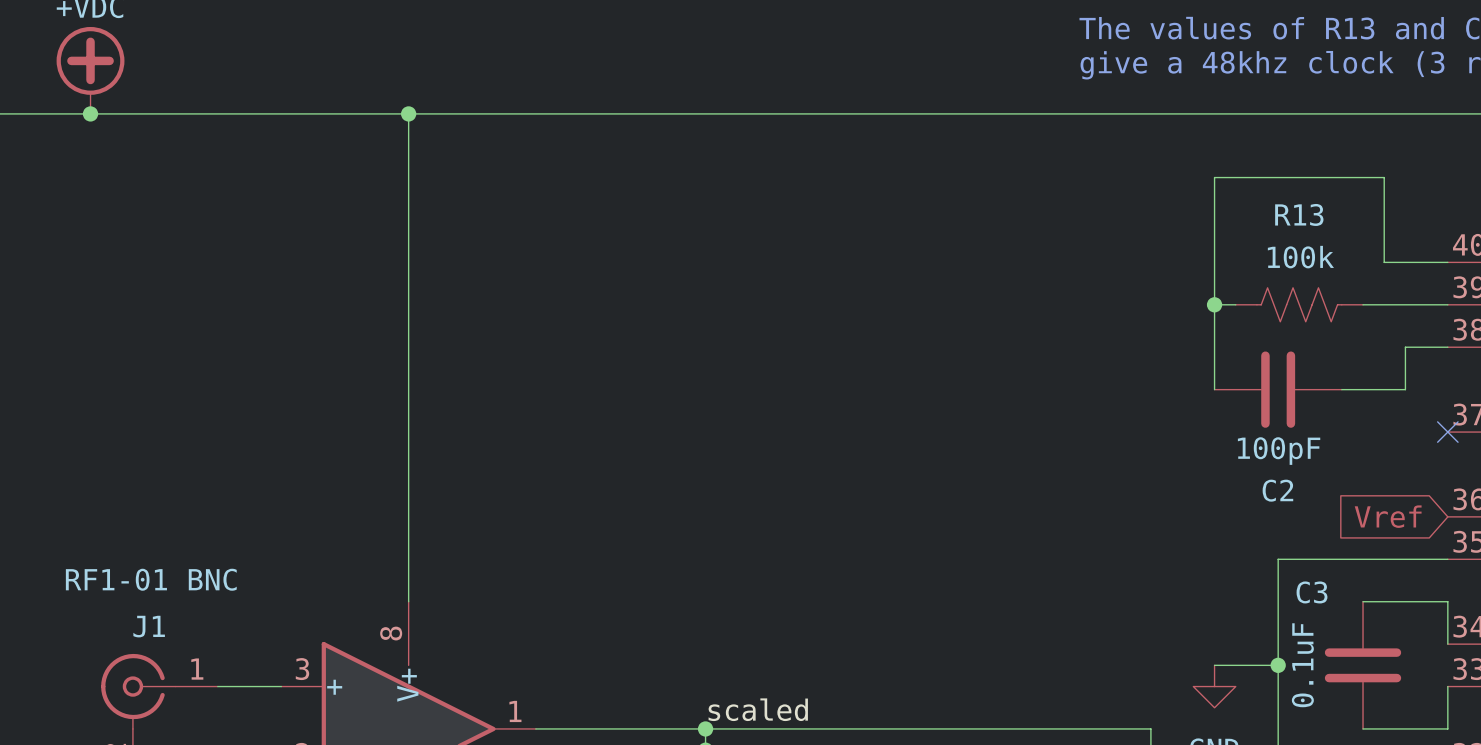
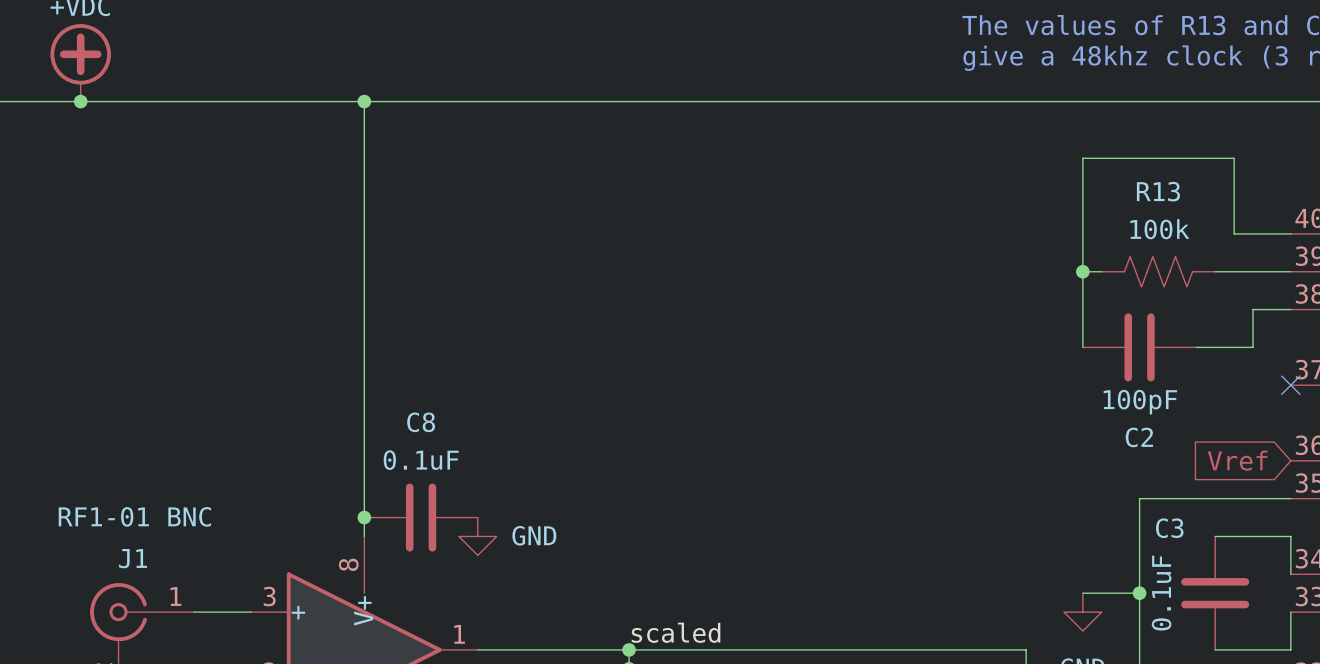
junction: none -> (364, 517)
C8: none -> 0.1uF (421, 517)
power symbol: none -> GND (477, 536)

